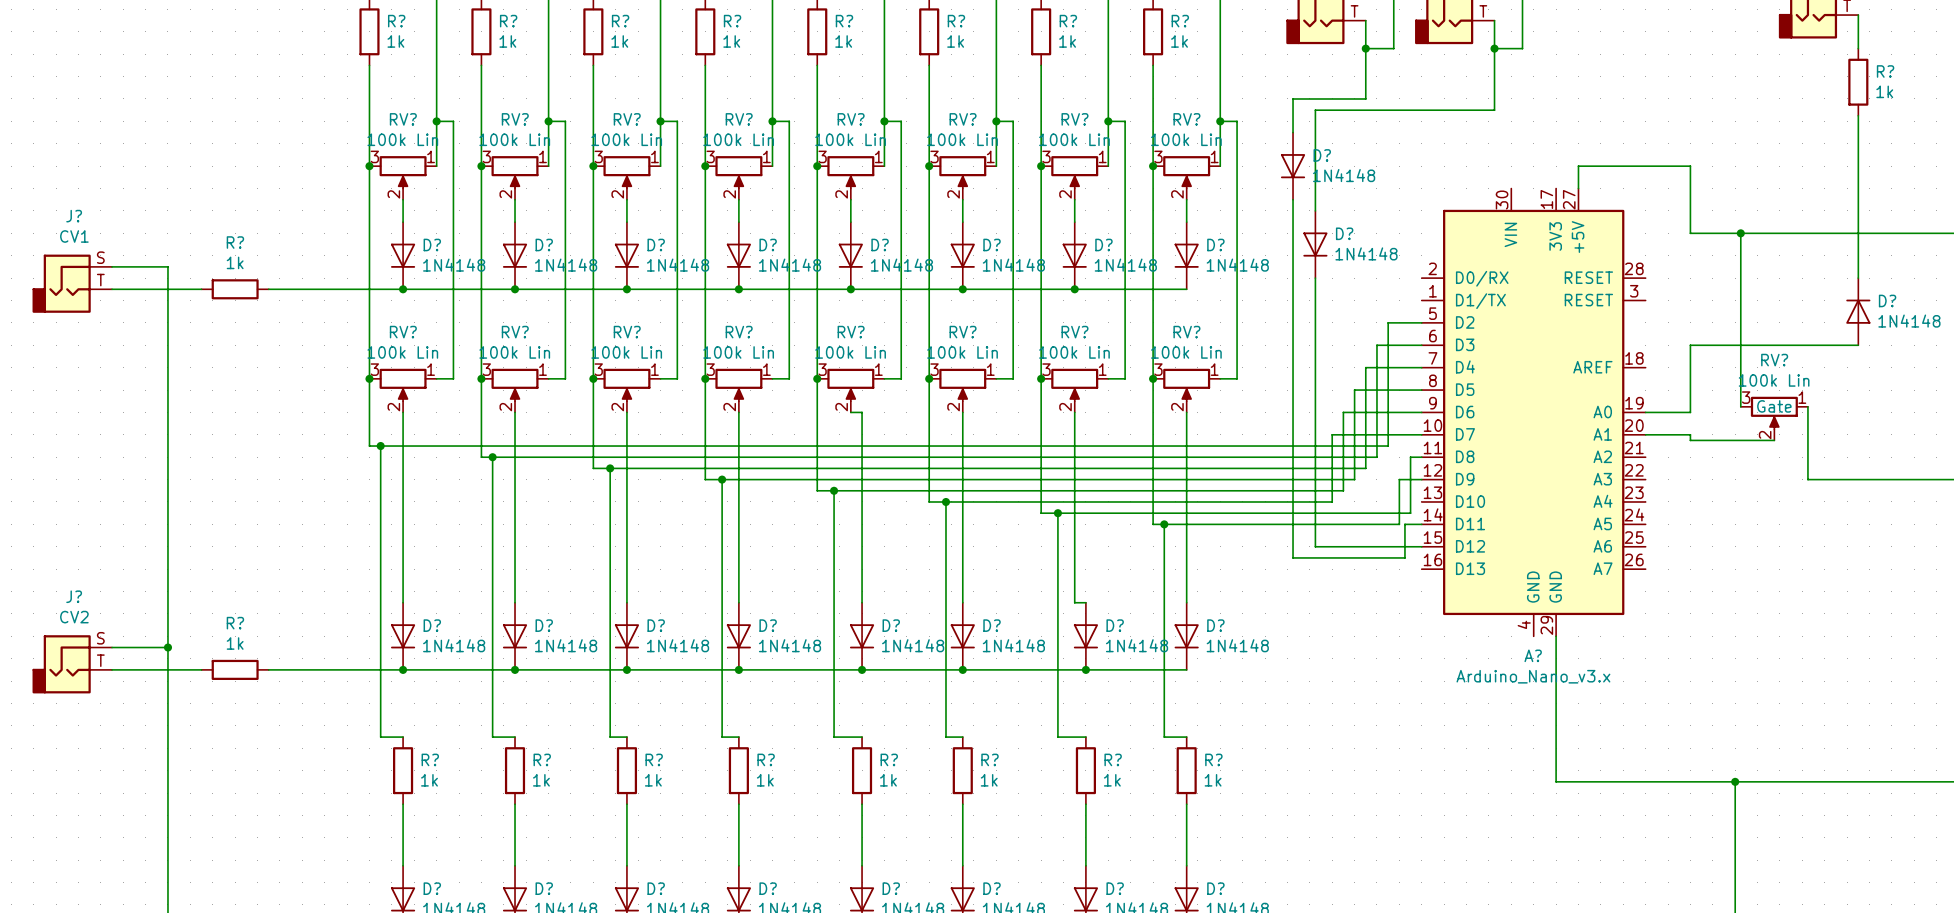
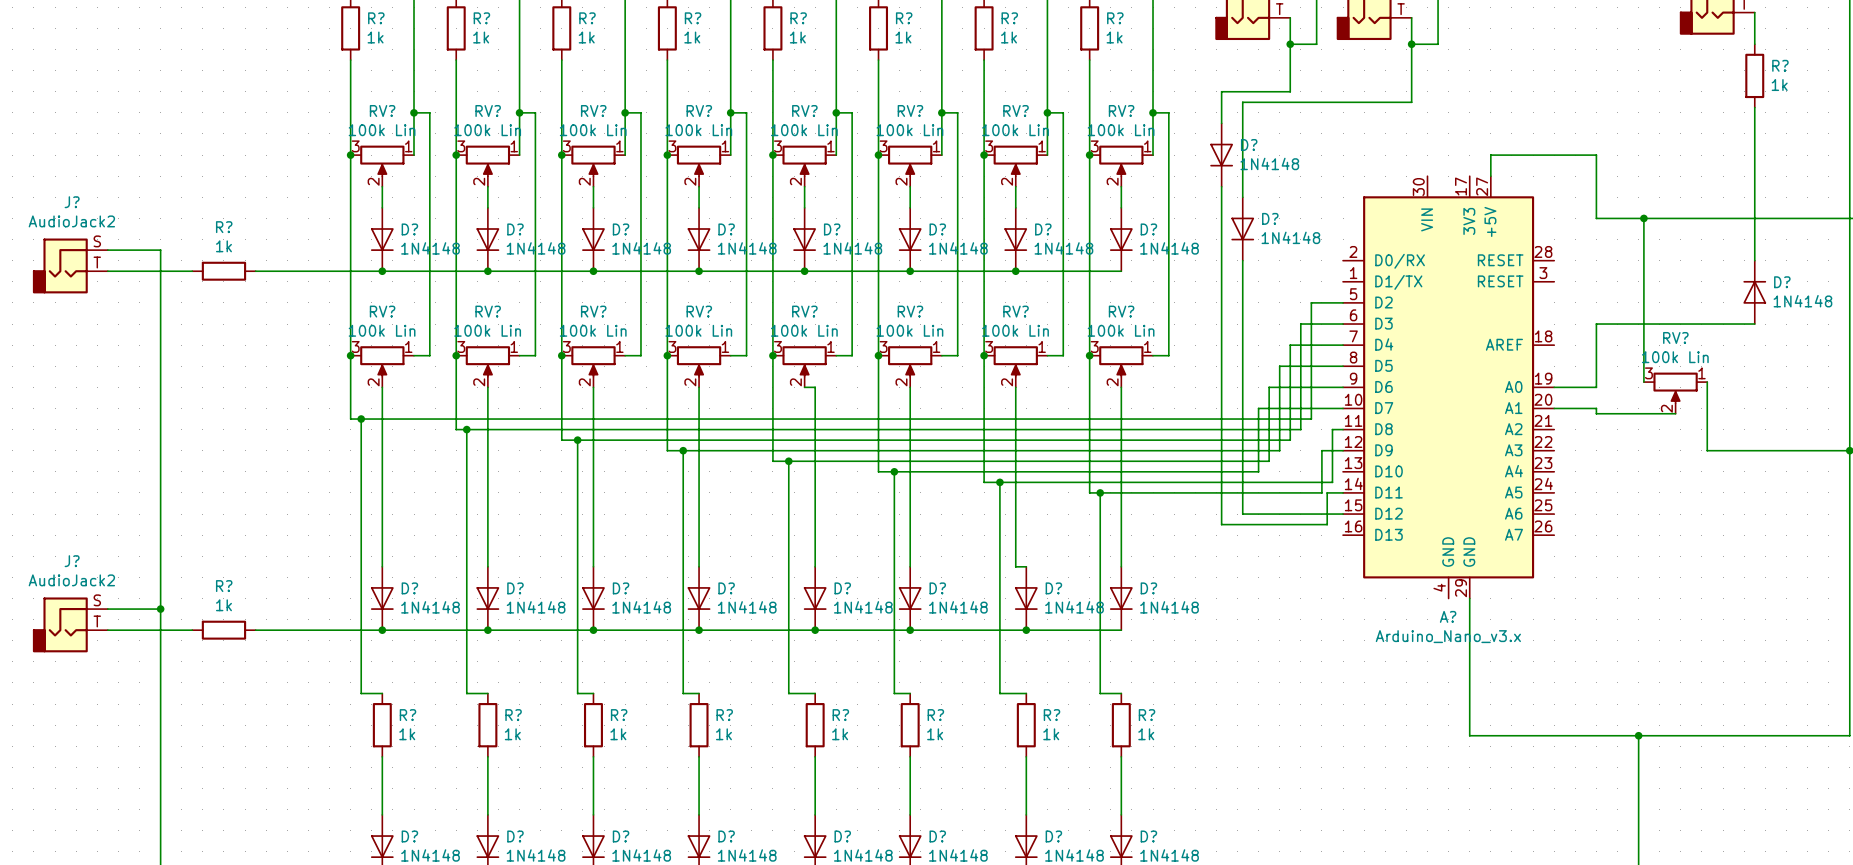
J? value: CV1 (74, 236) -> AudioJack2 (71, 221)
RV? text: Gate (1774, 406) -> none
J? value: CV2 (74, 617) -> AudioJack2 (71, 580)

